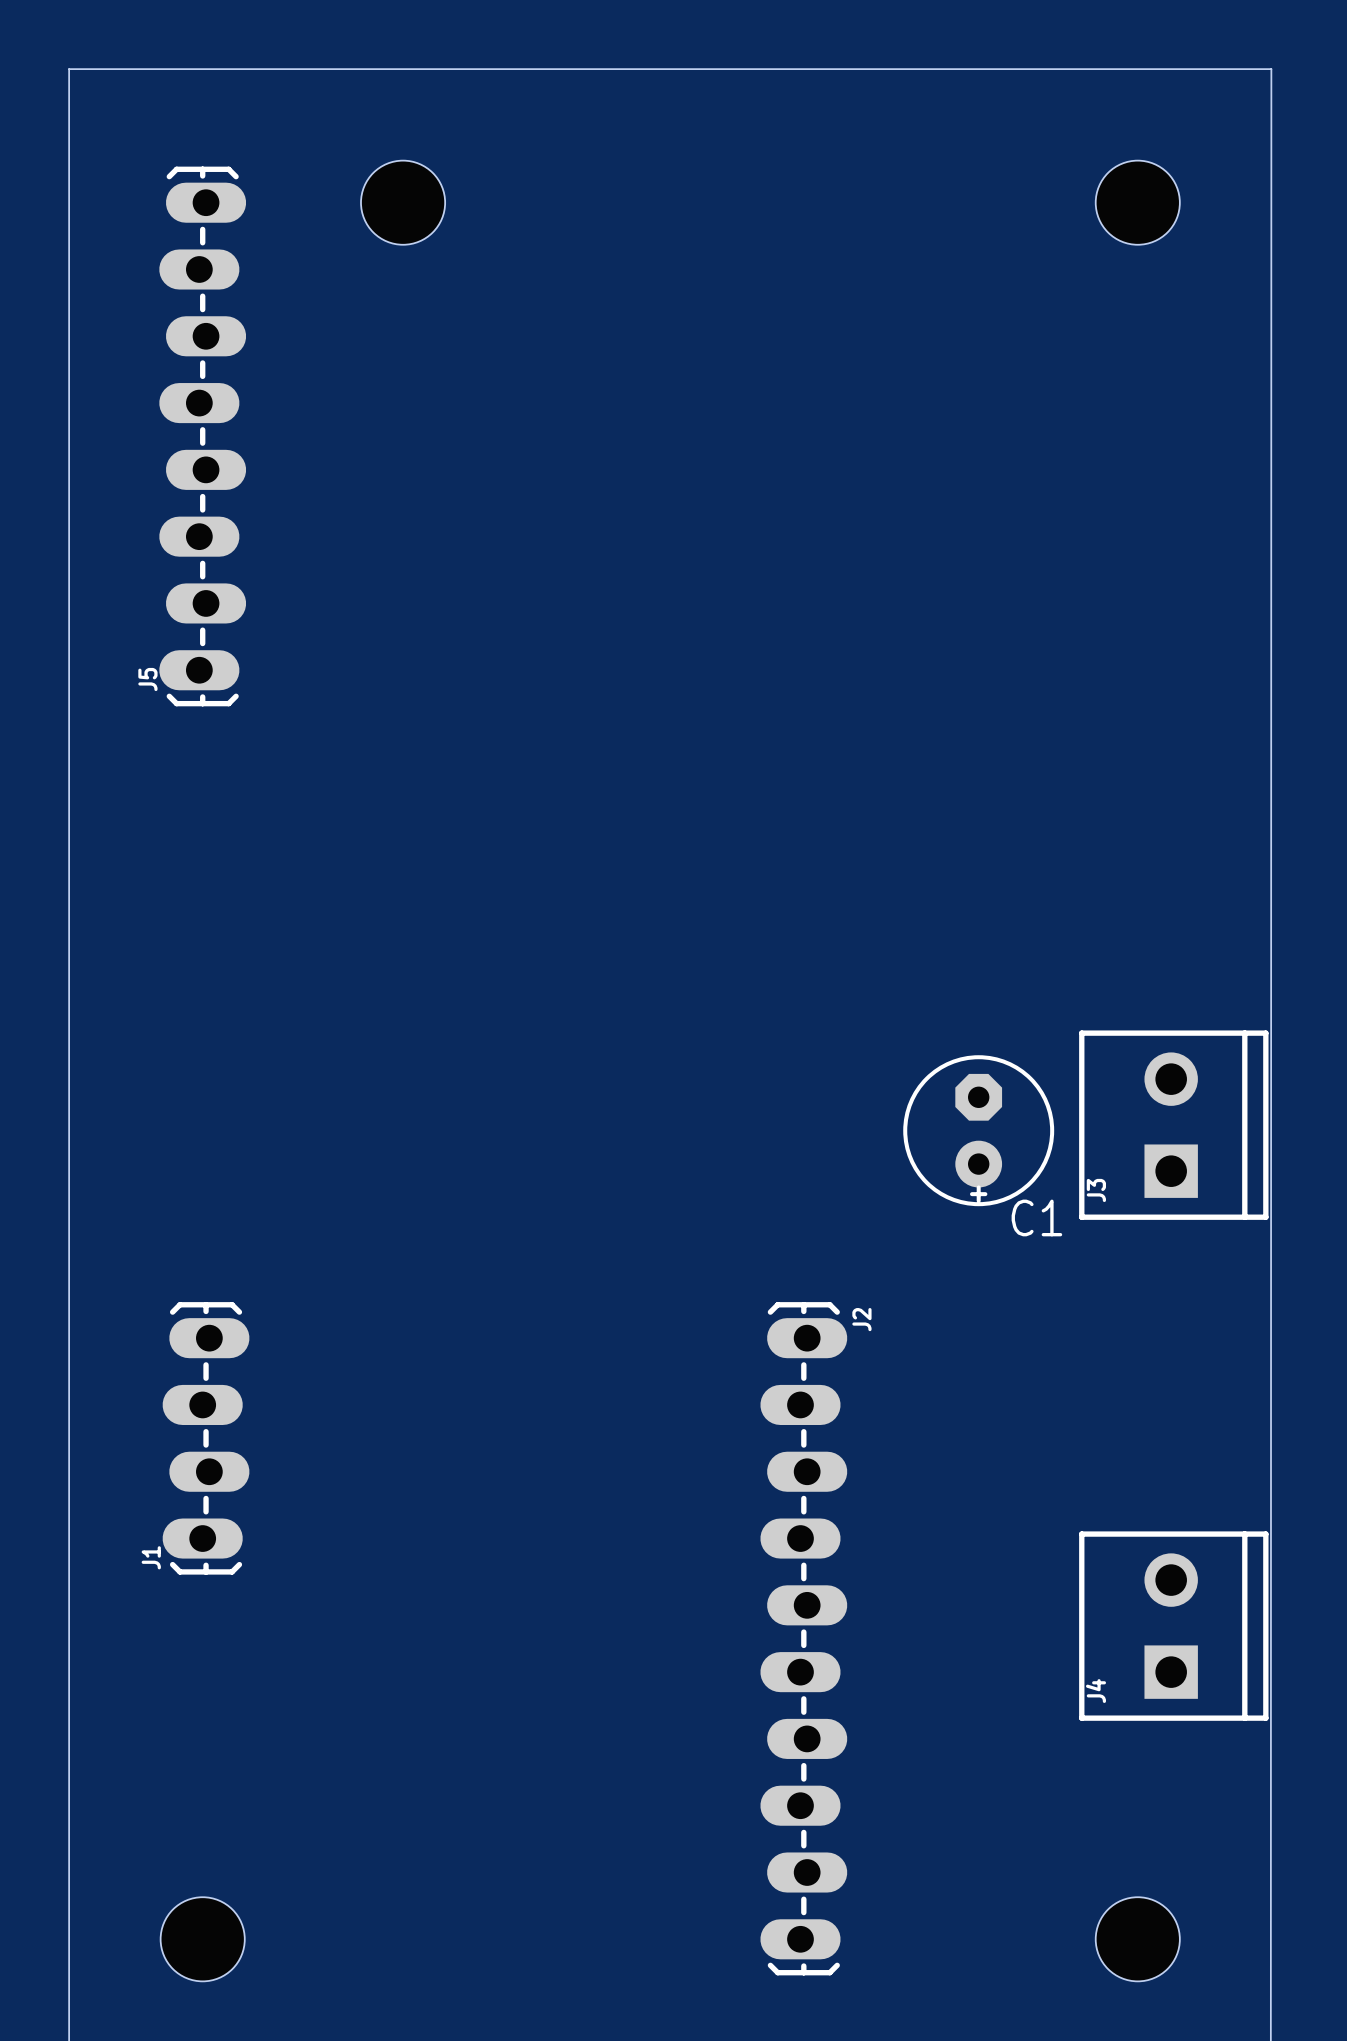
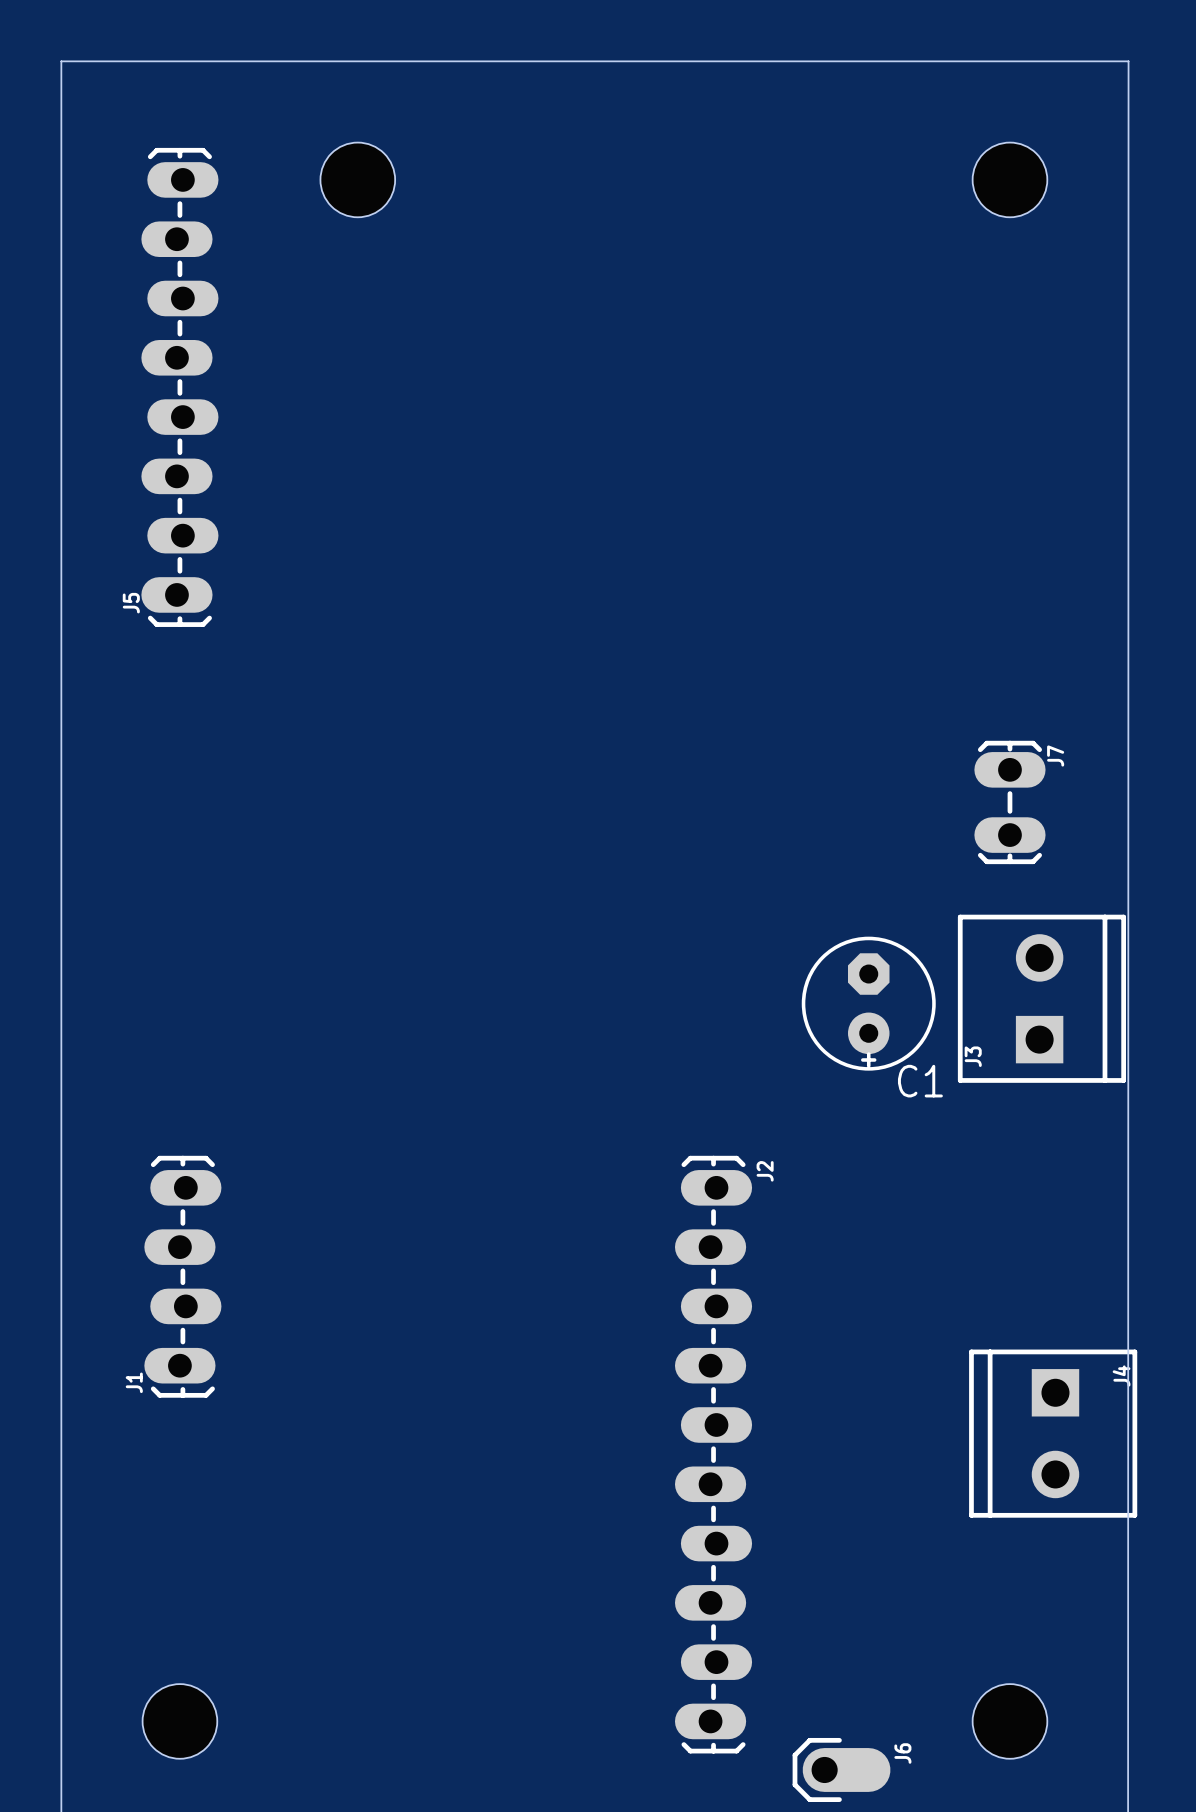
J7: none -> (1009, 802)
J4 rotation: 0° (1173, 1626) -> 180° (1053, 1433)
J6: none -> (841, 1769)

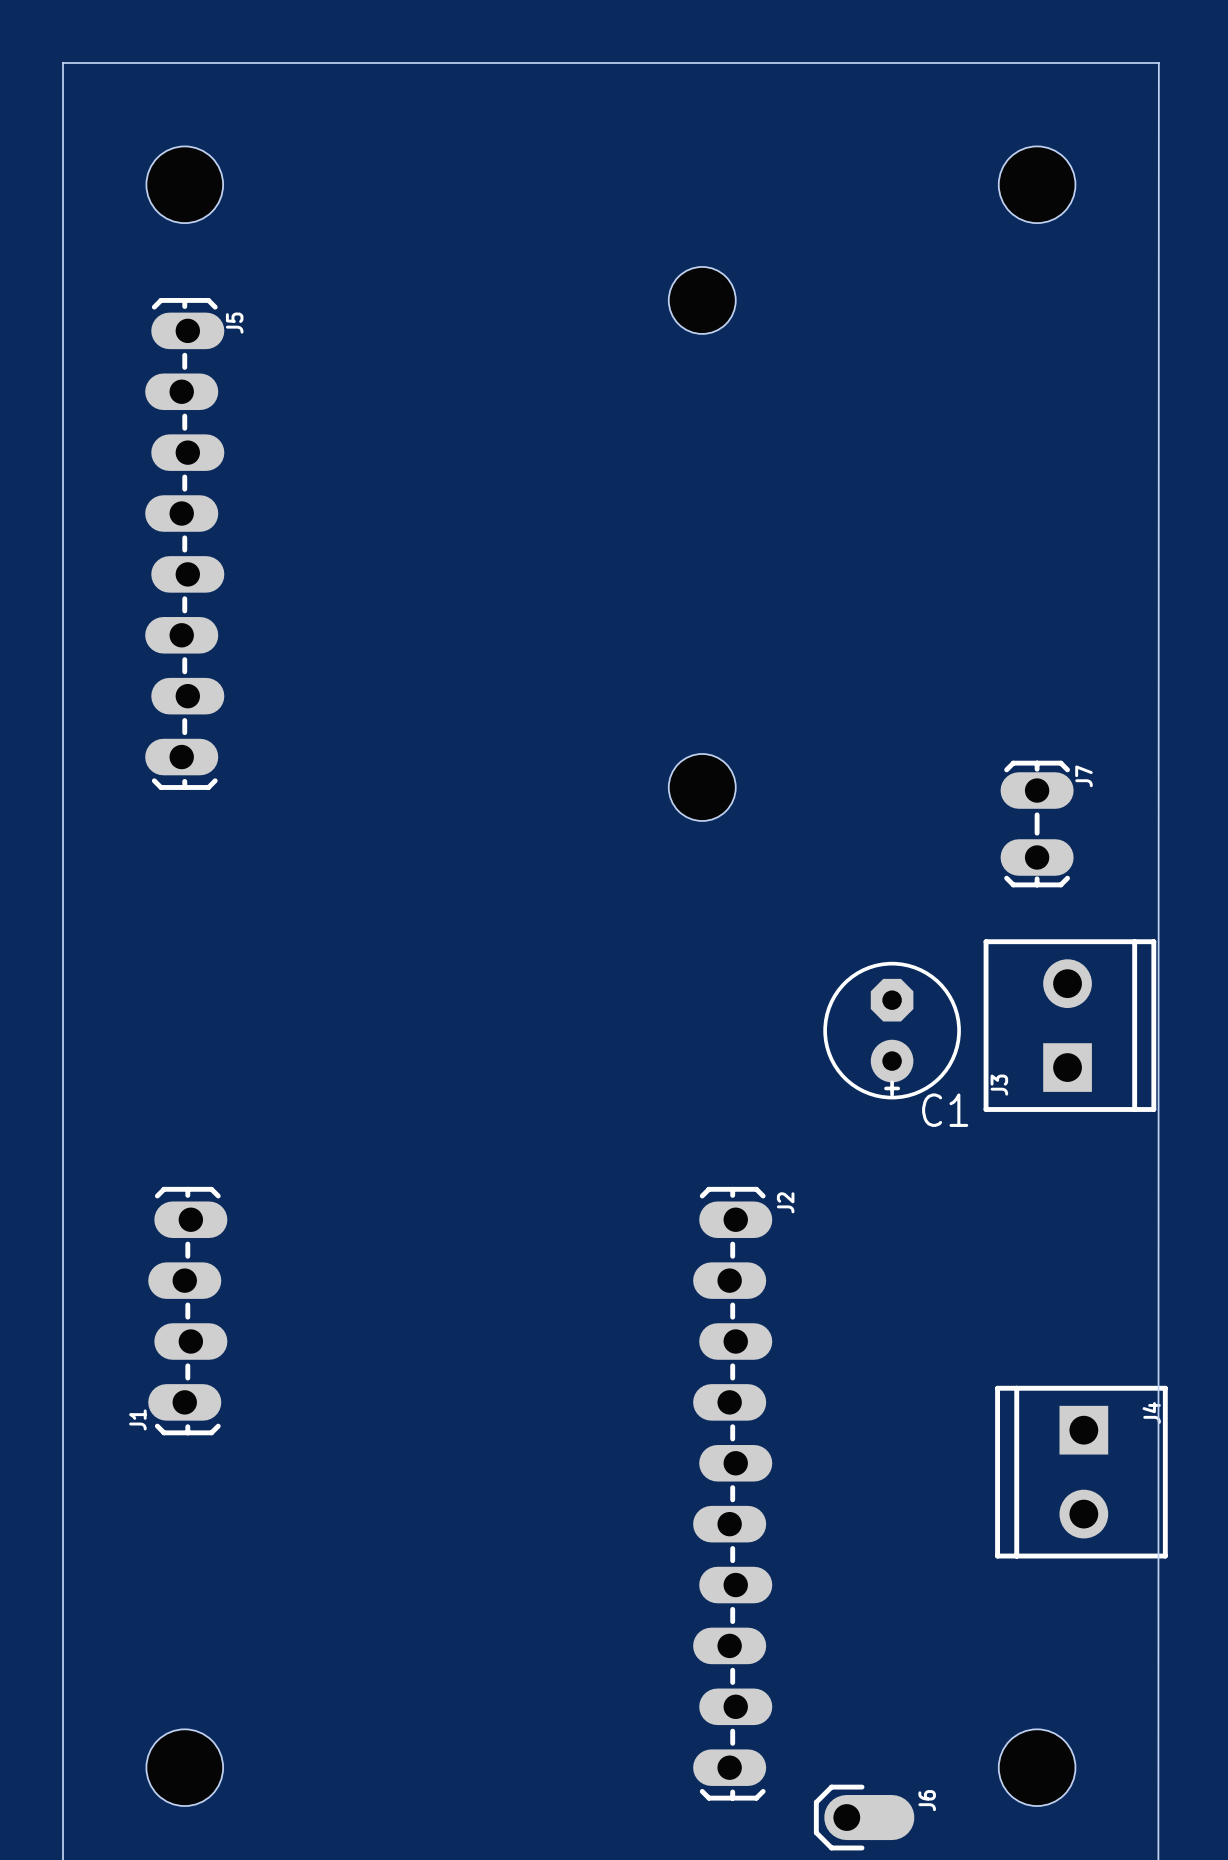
hole position: (357, 179) -> (184, 184)
hole: none -> (702, 300)
J5 position: (179, 387) -> (184, 543)
J5 name position: J5 (131, 603) -> J5 (234, 323)
hole: none -> (702, 787)

